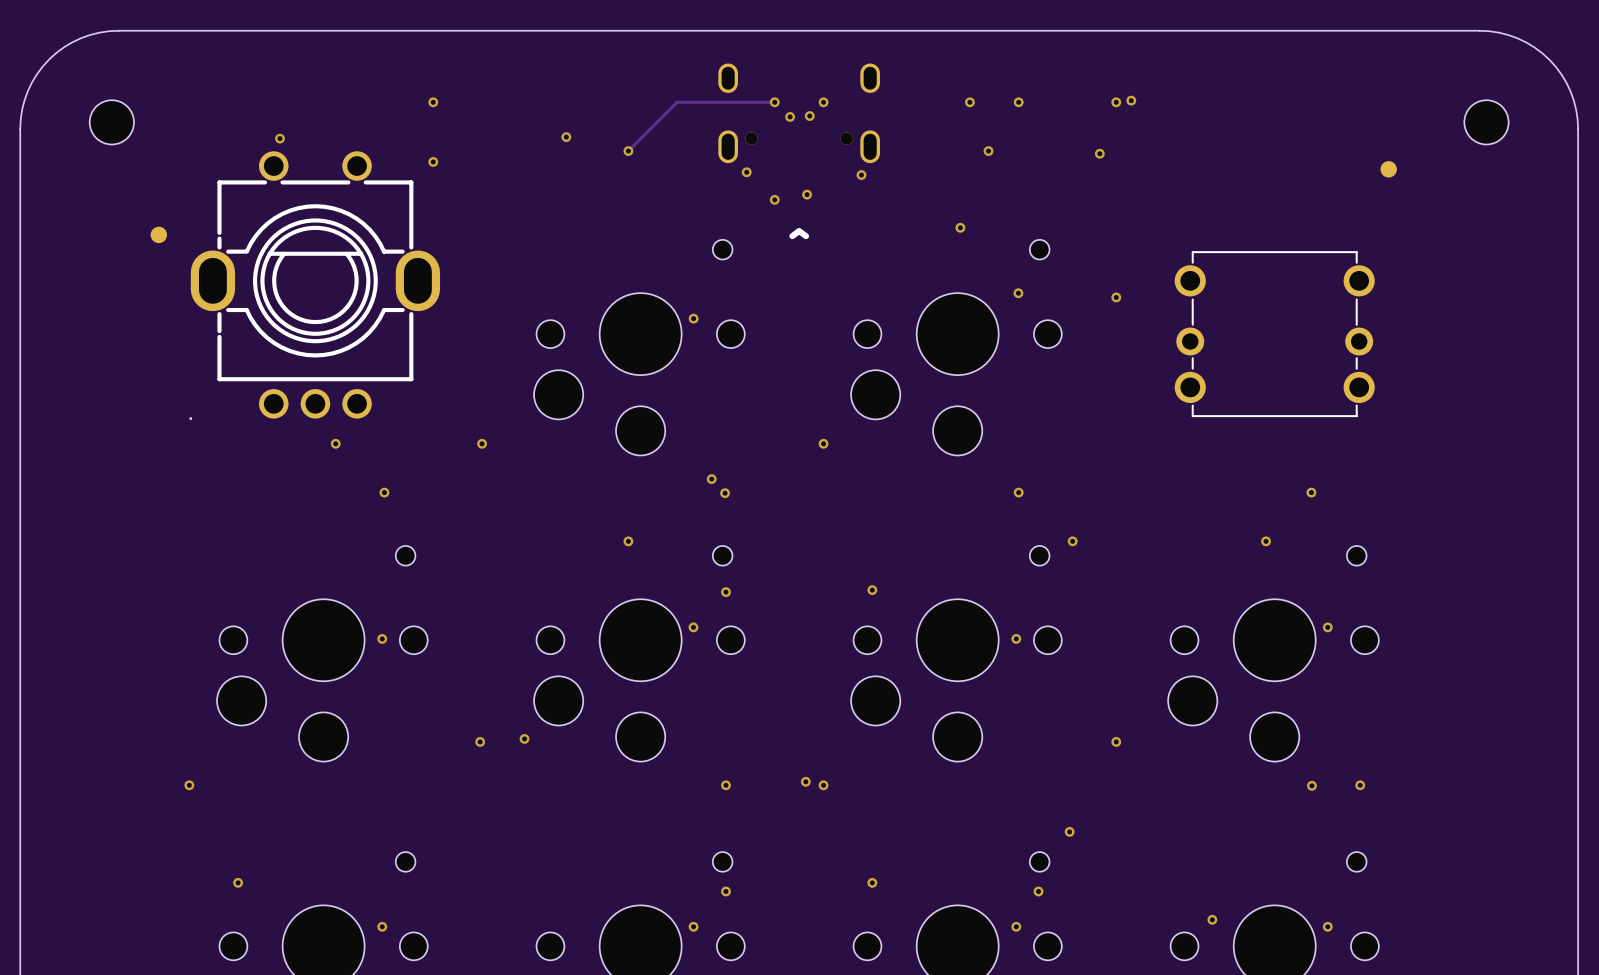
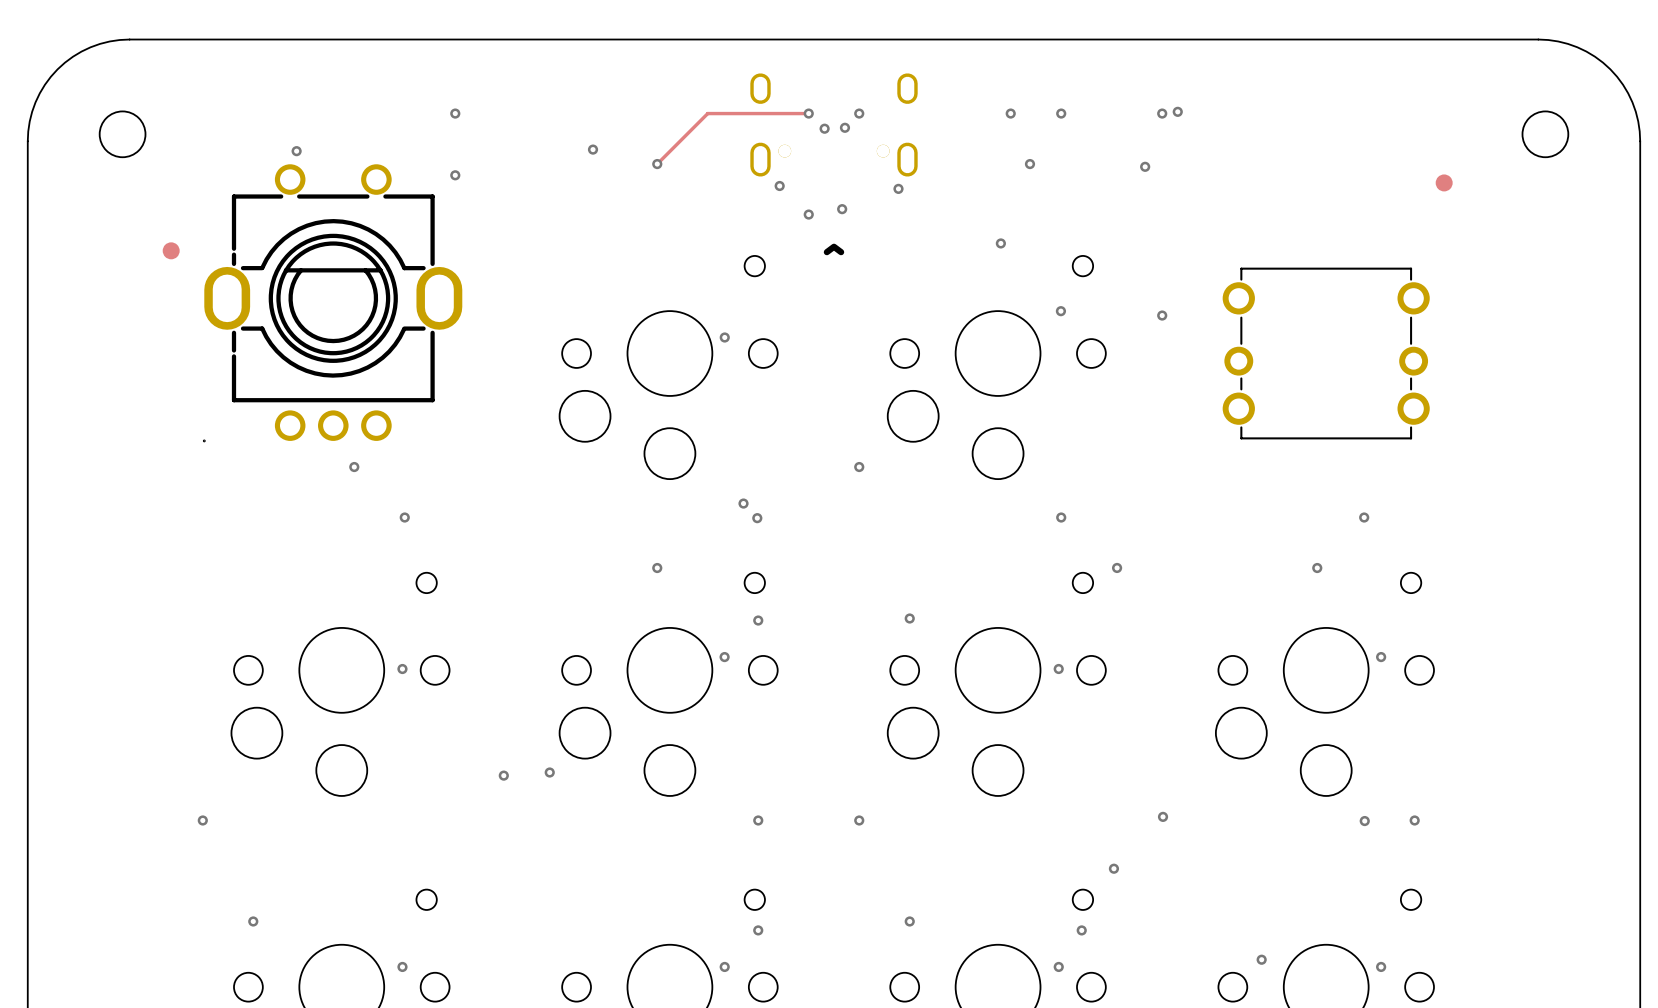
via: (482, 443) -> none
via position: (1116, 741) -> (1163, 816)
via: (805, 781) -> none

